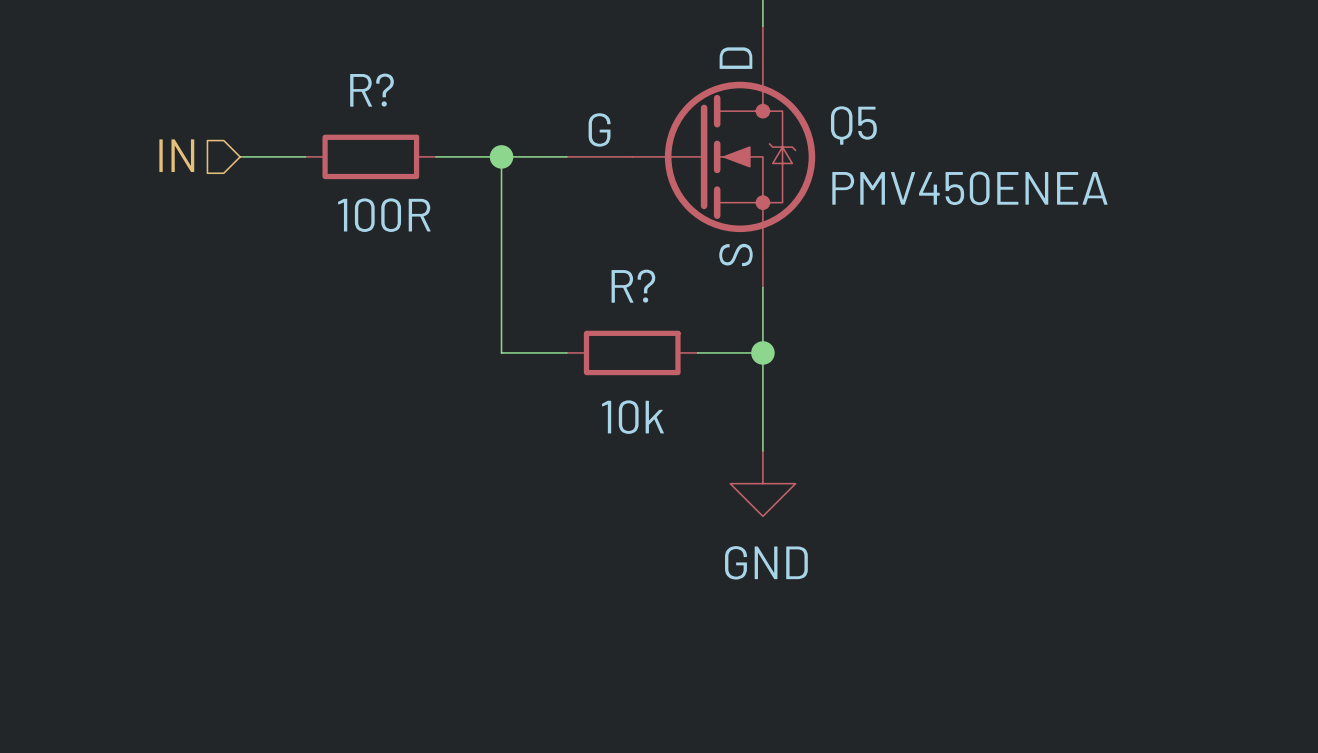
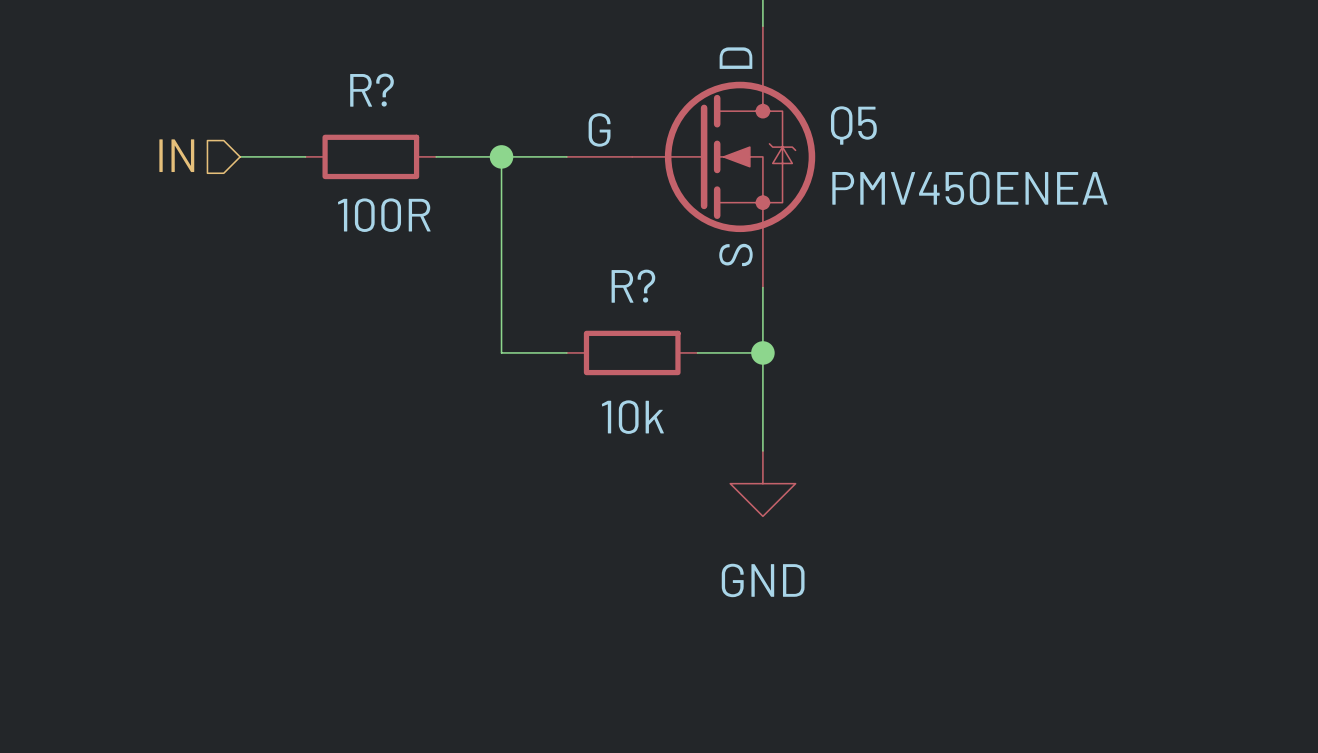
power symbol text position: GND (766, 562) -> GND (763, 580)

